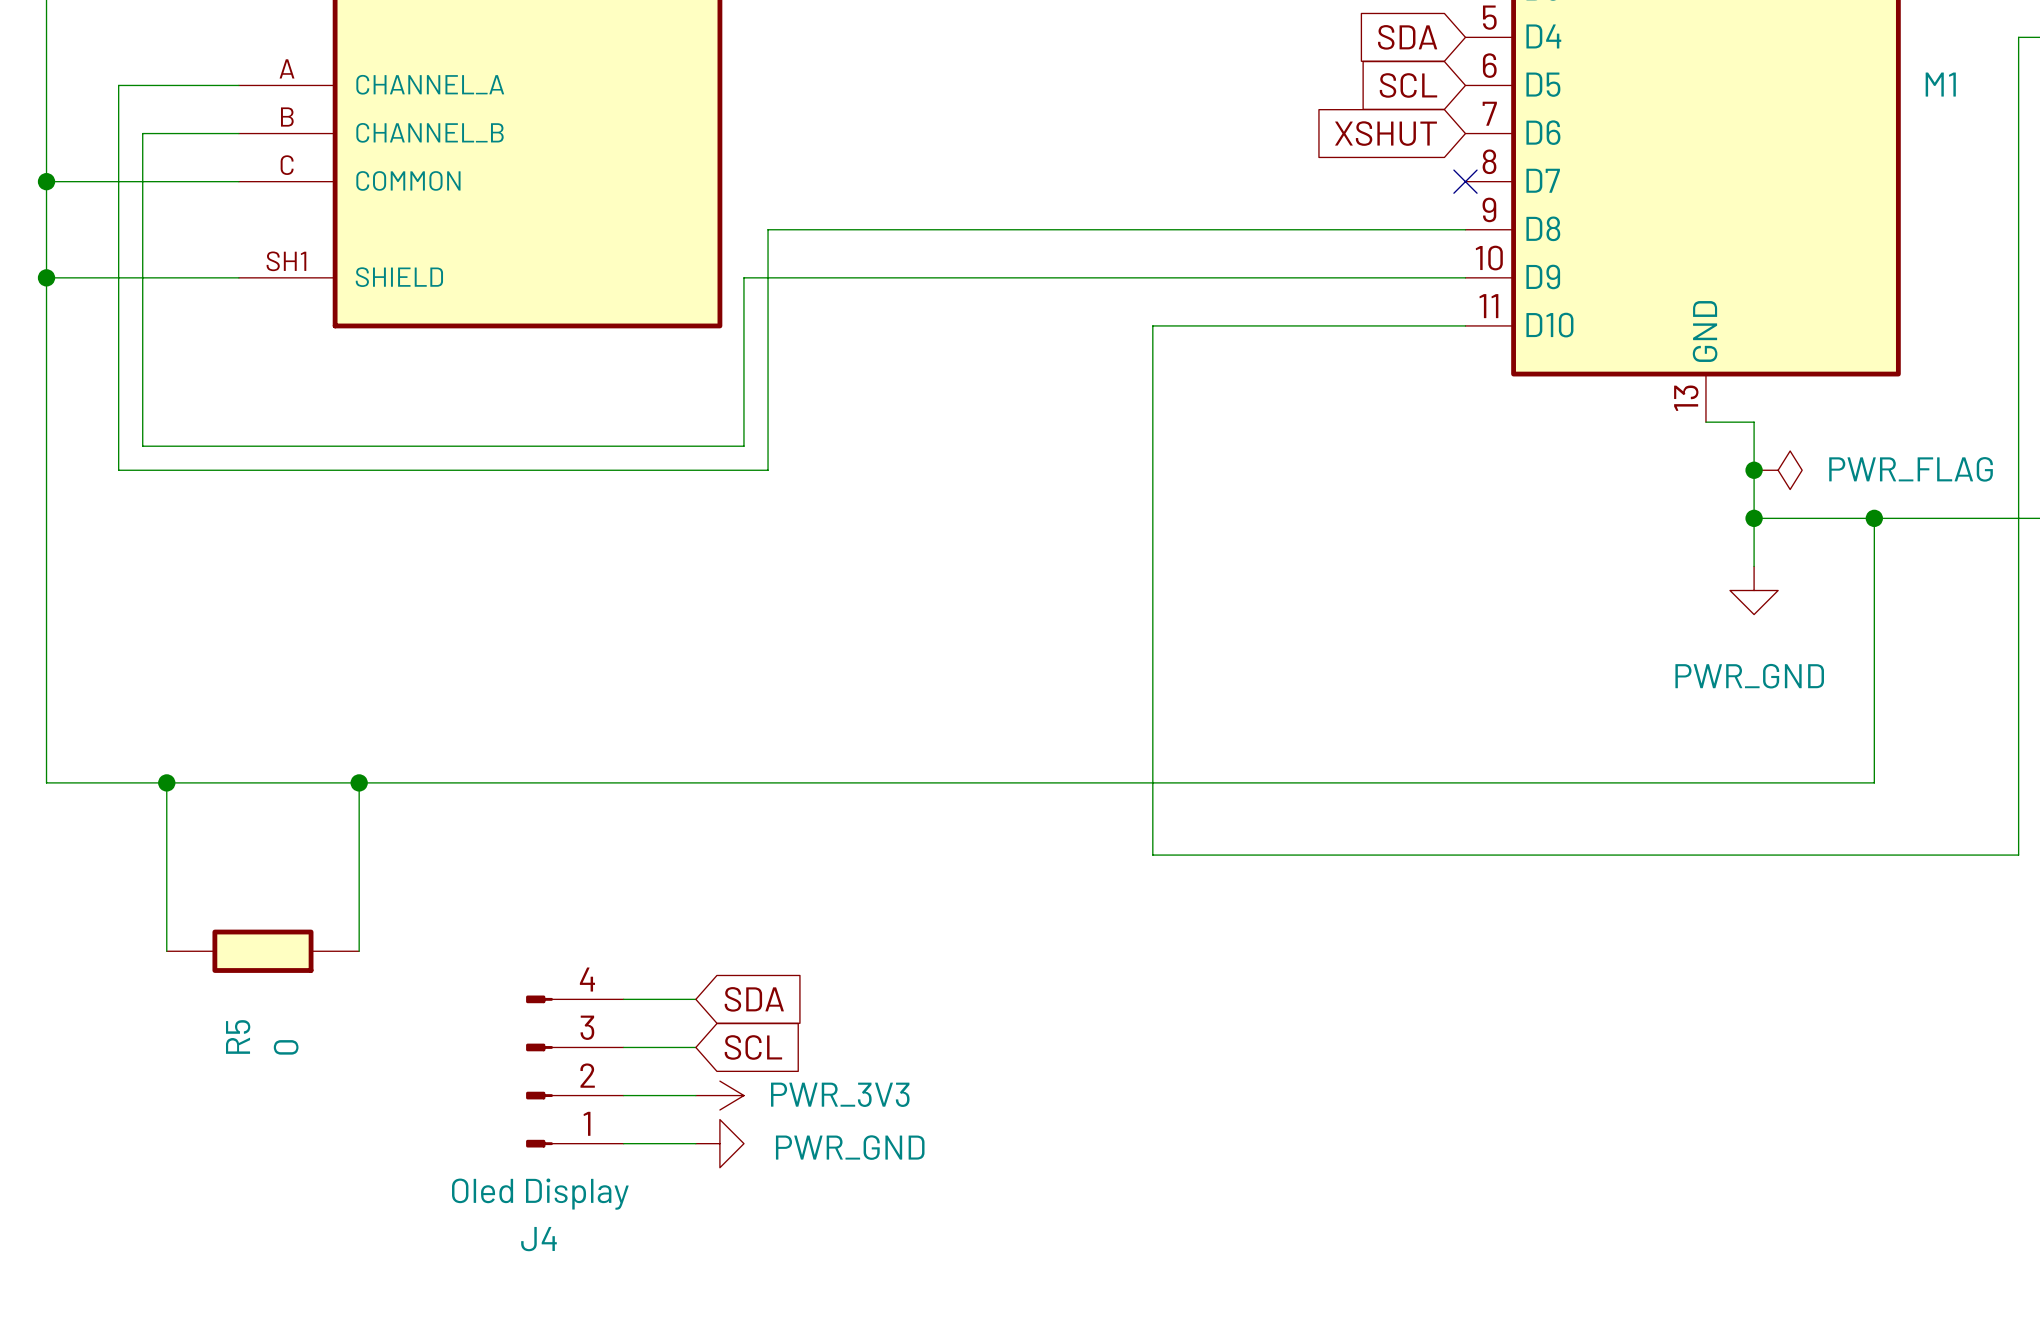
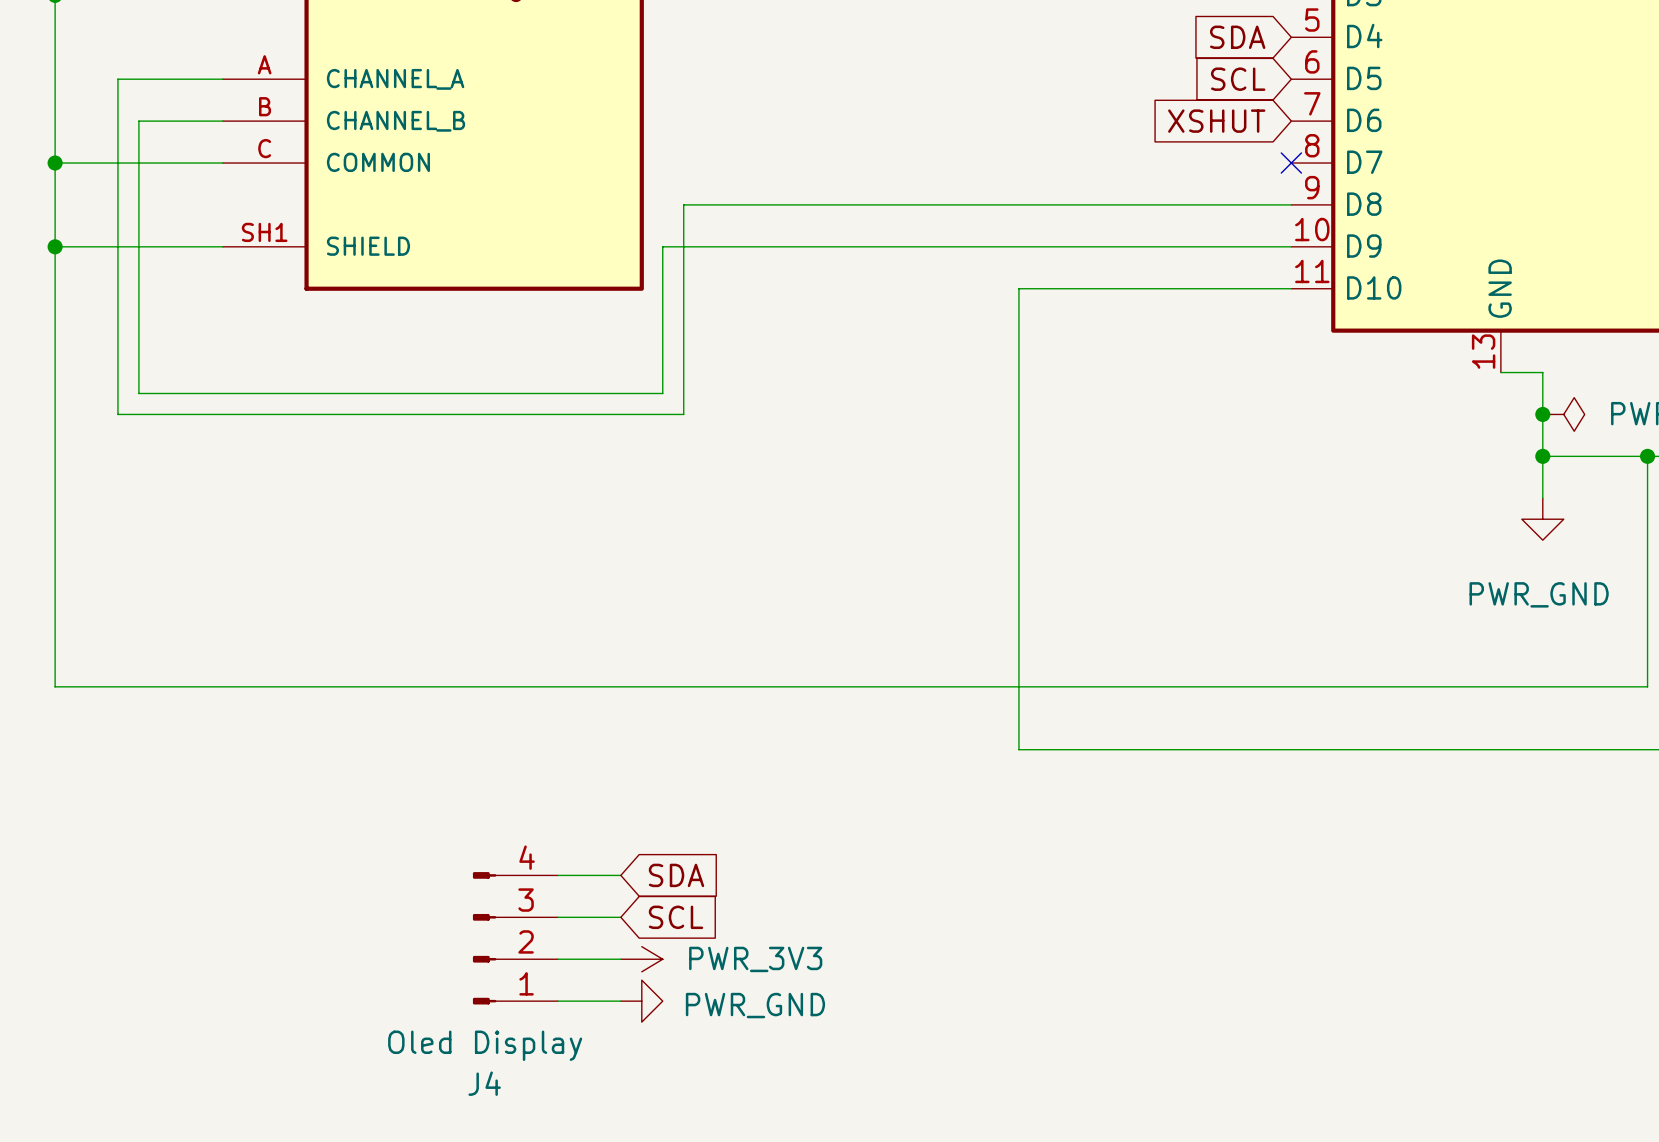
wire: (166, 782) (166, 951) -> none
junction: (166, 782) -> none
wire: (359, 782) (359, 951) -> none
junction: (359, 782) -> none
R5: 0 (262, 951) -> none

